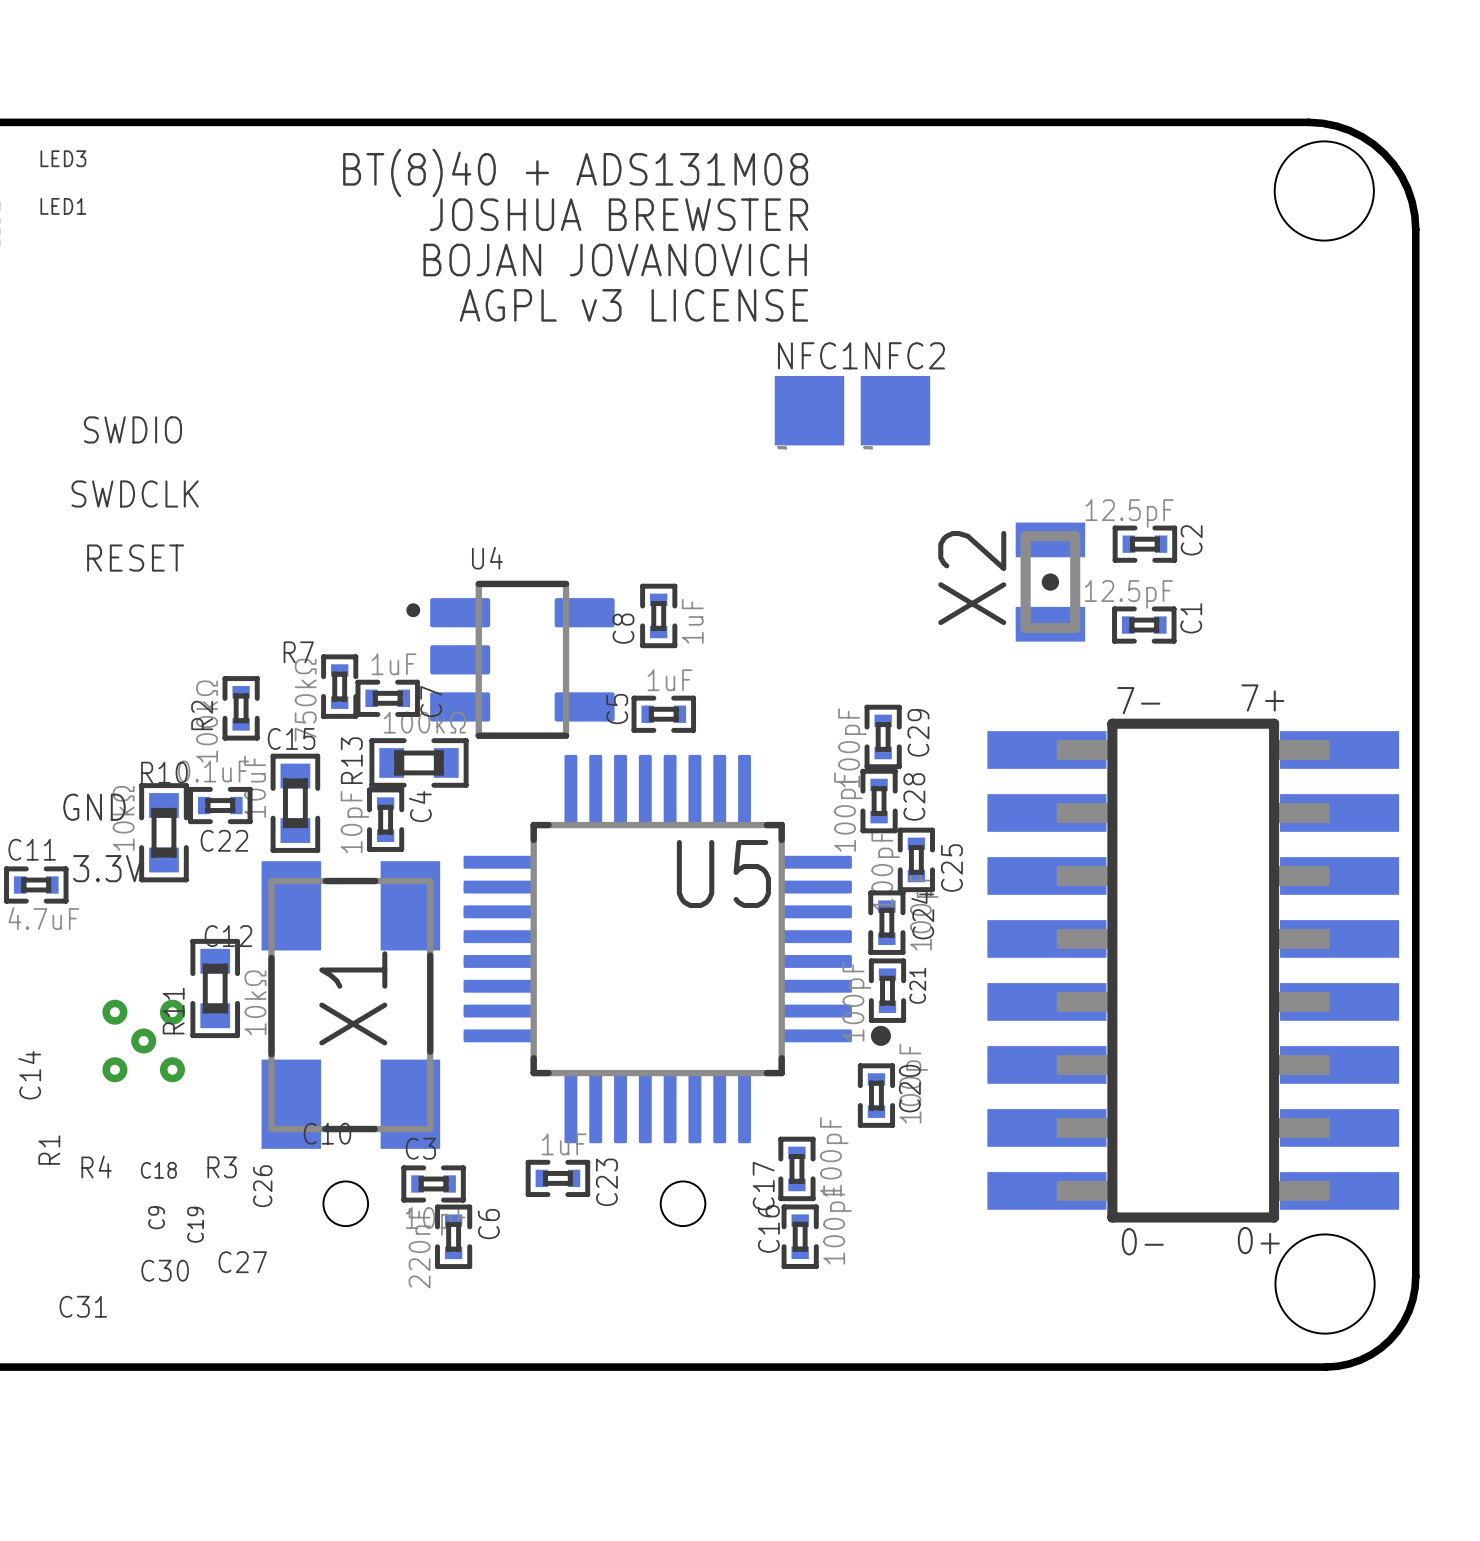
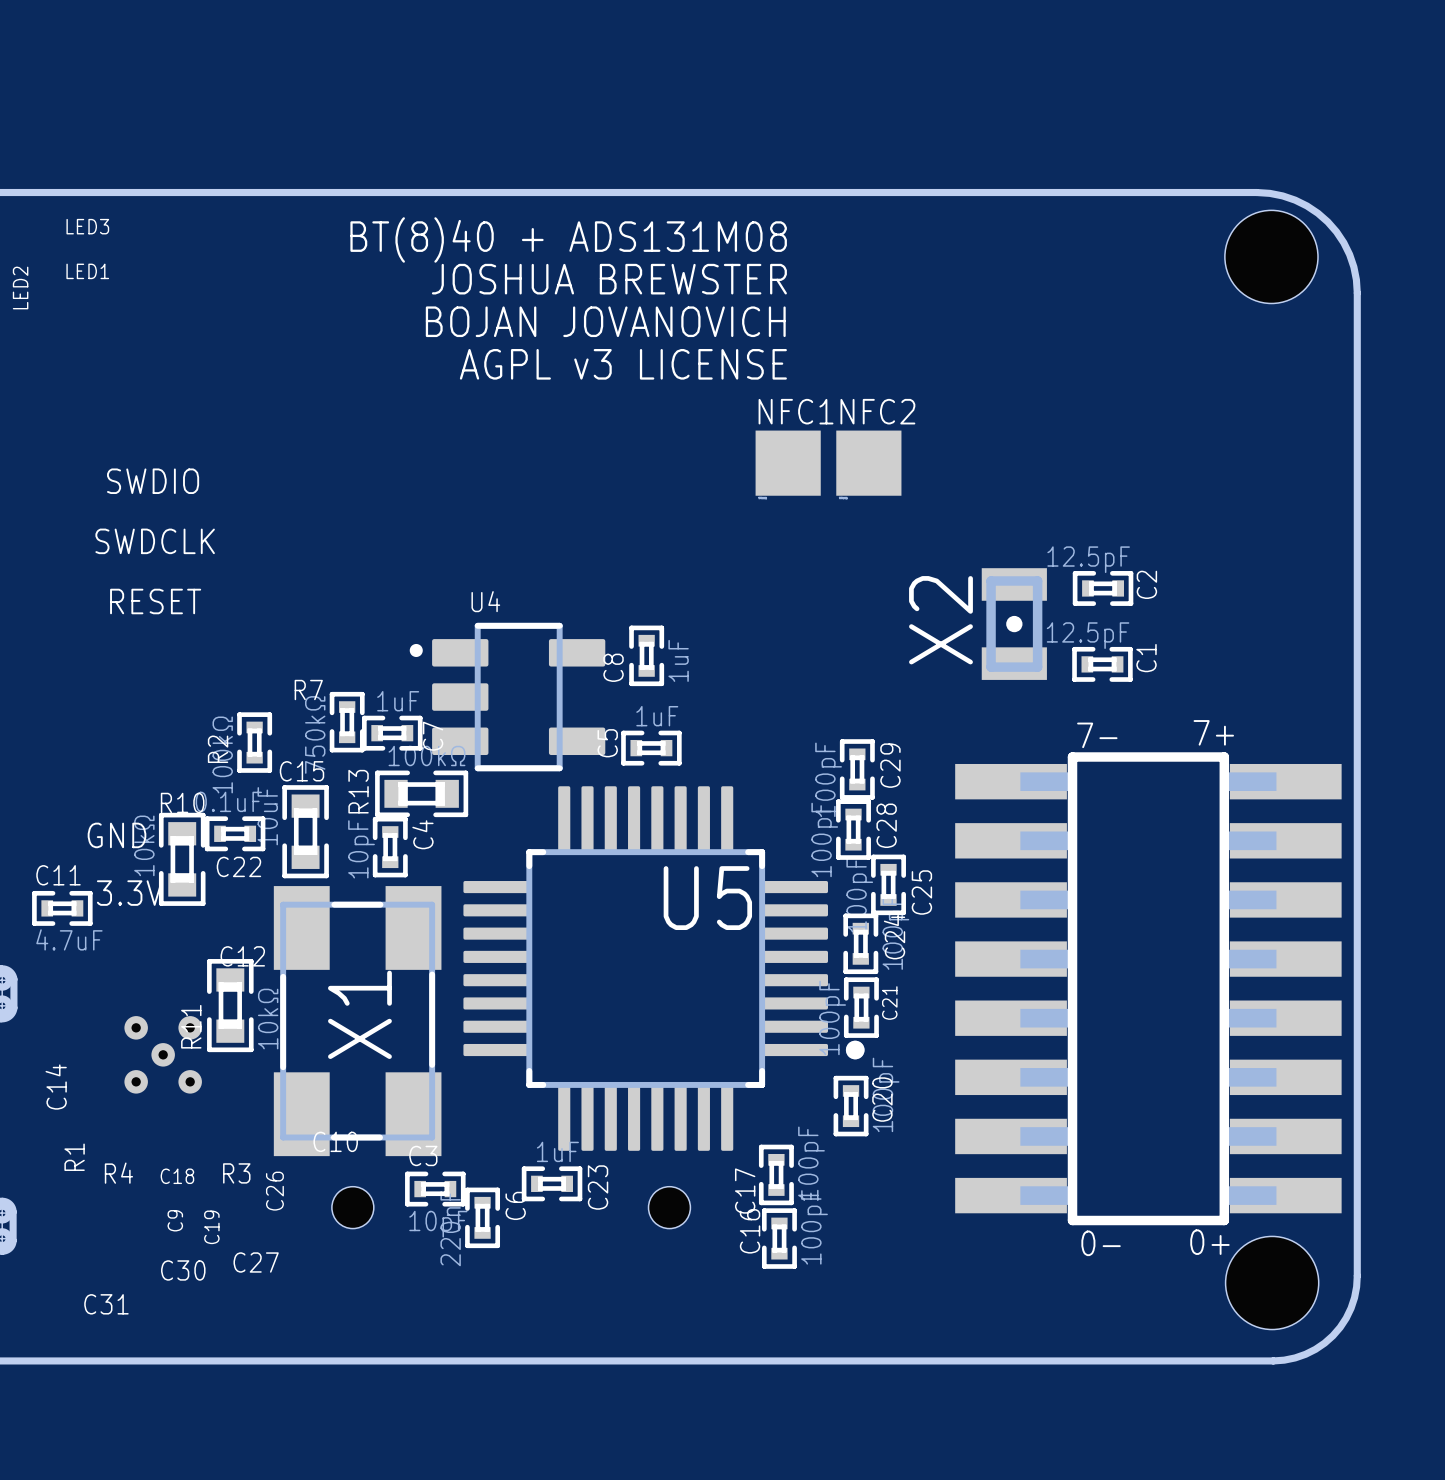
C6 position: (453, 1236) -> (482, 1217)

